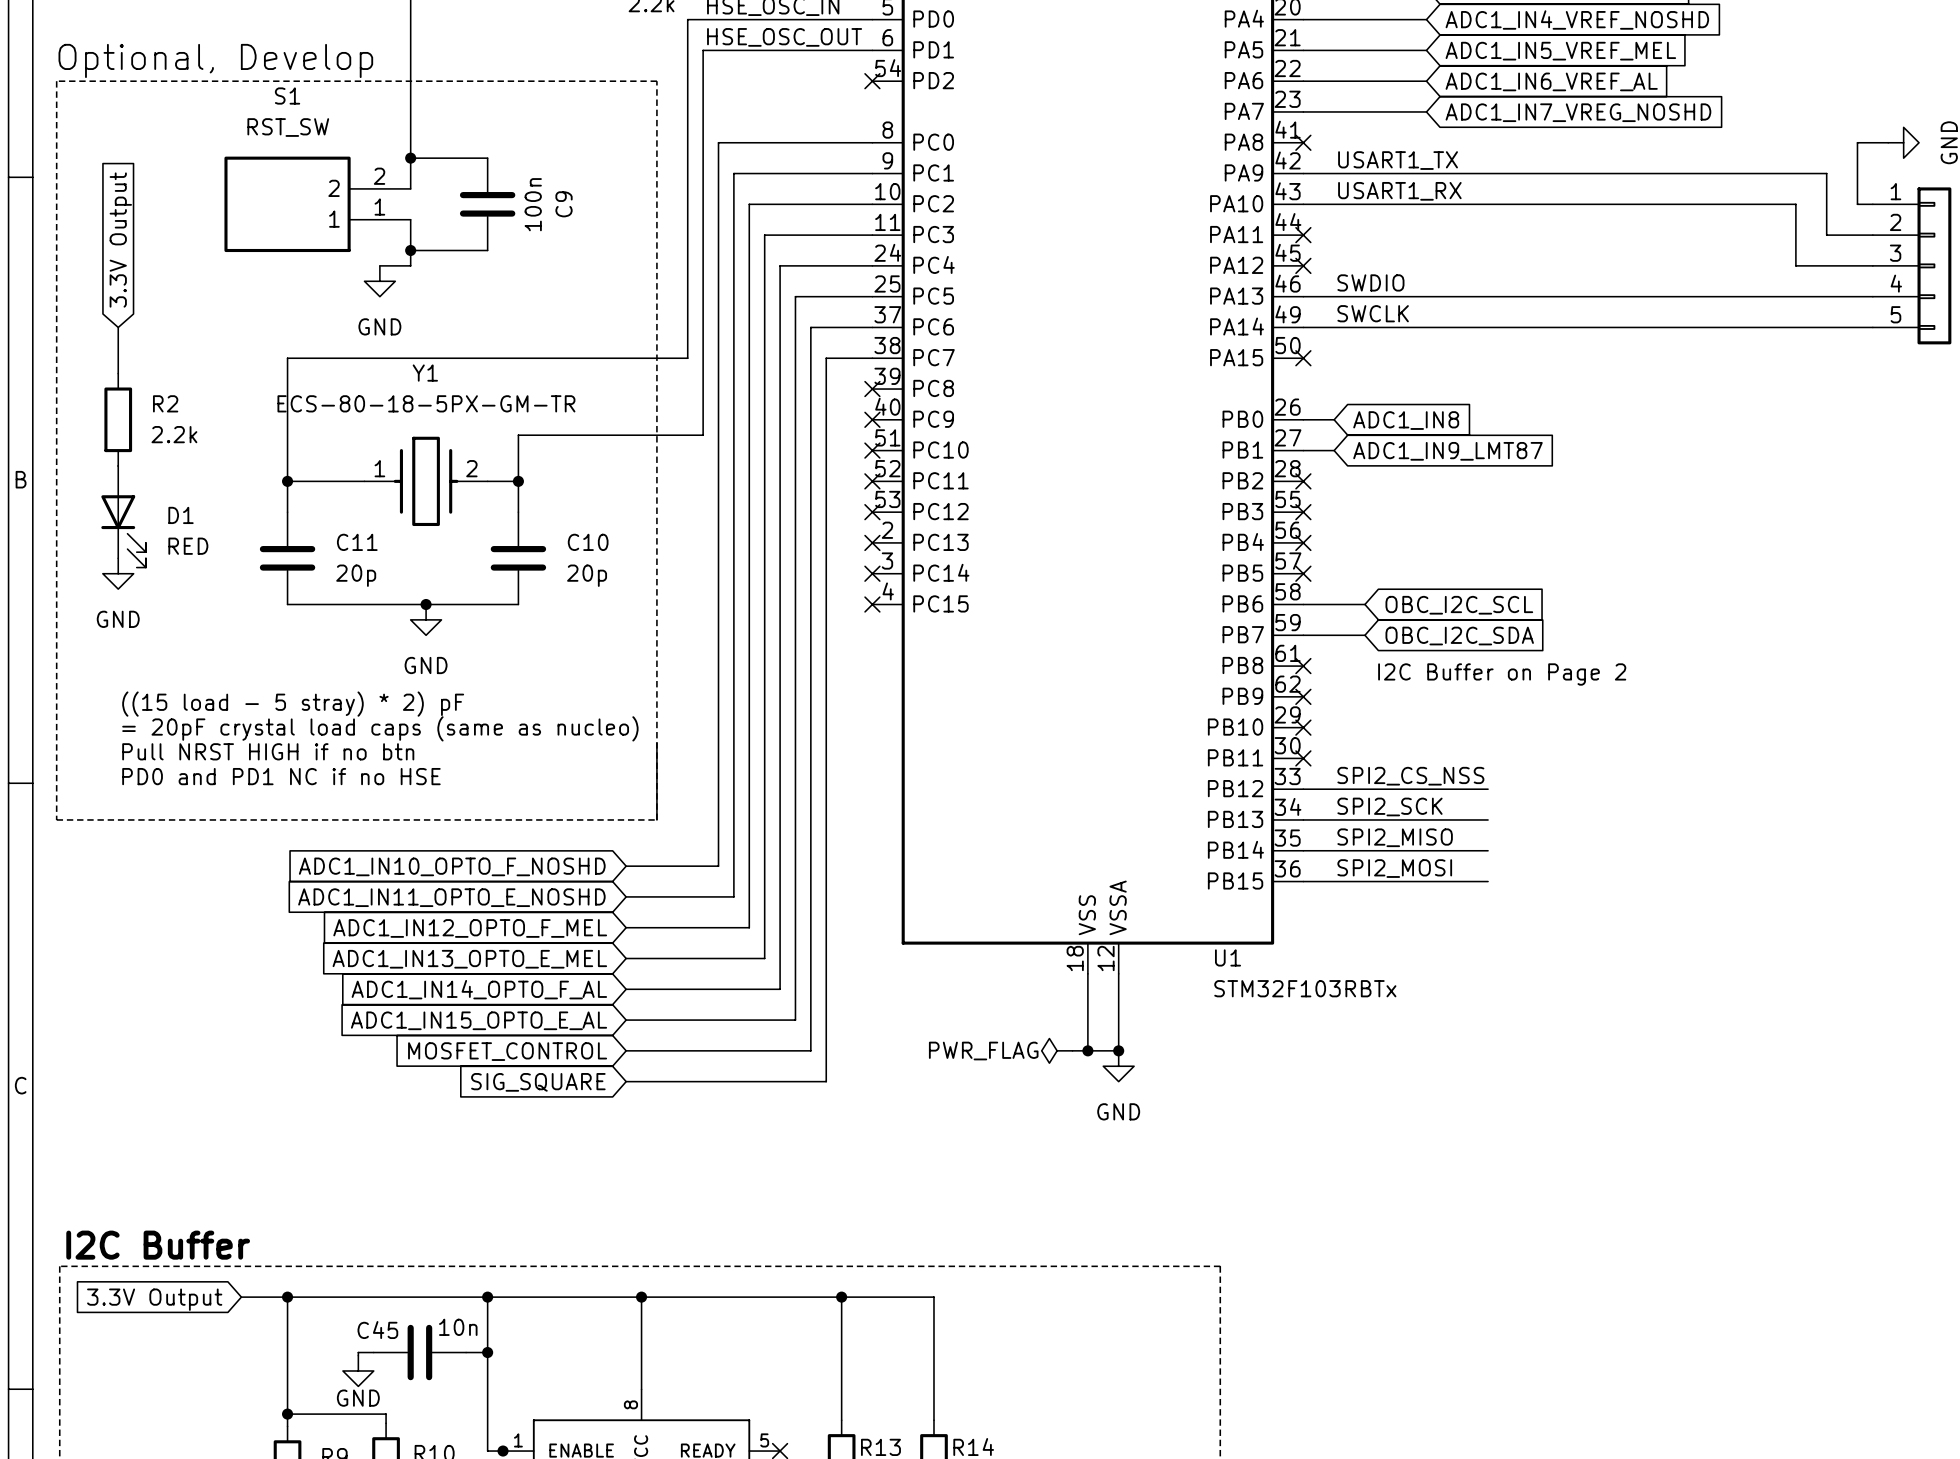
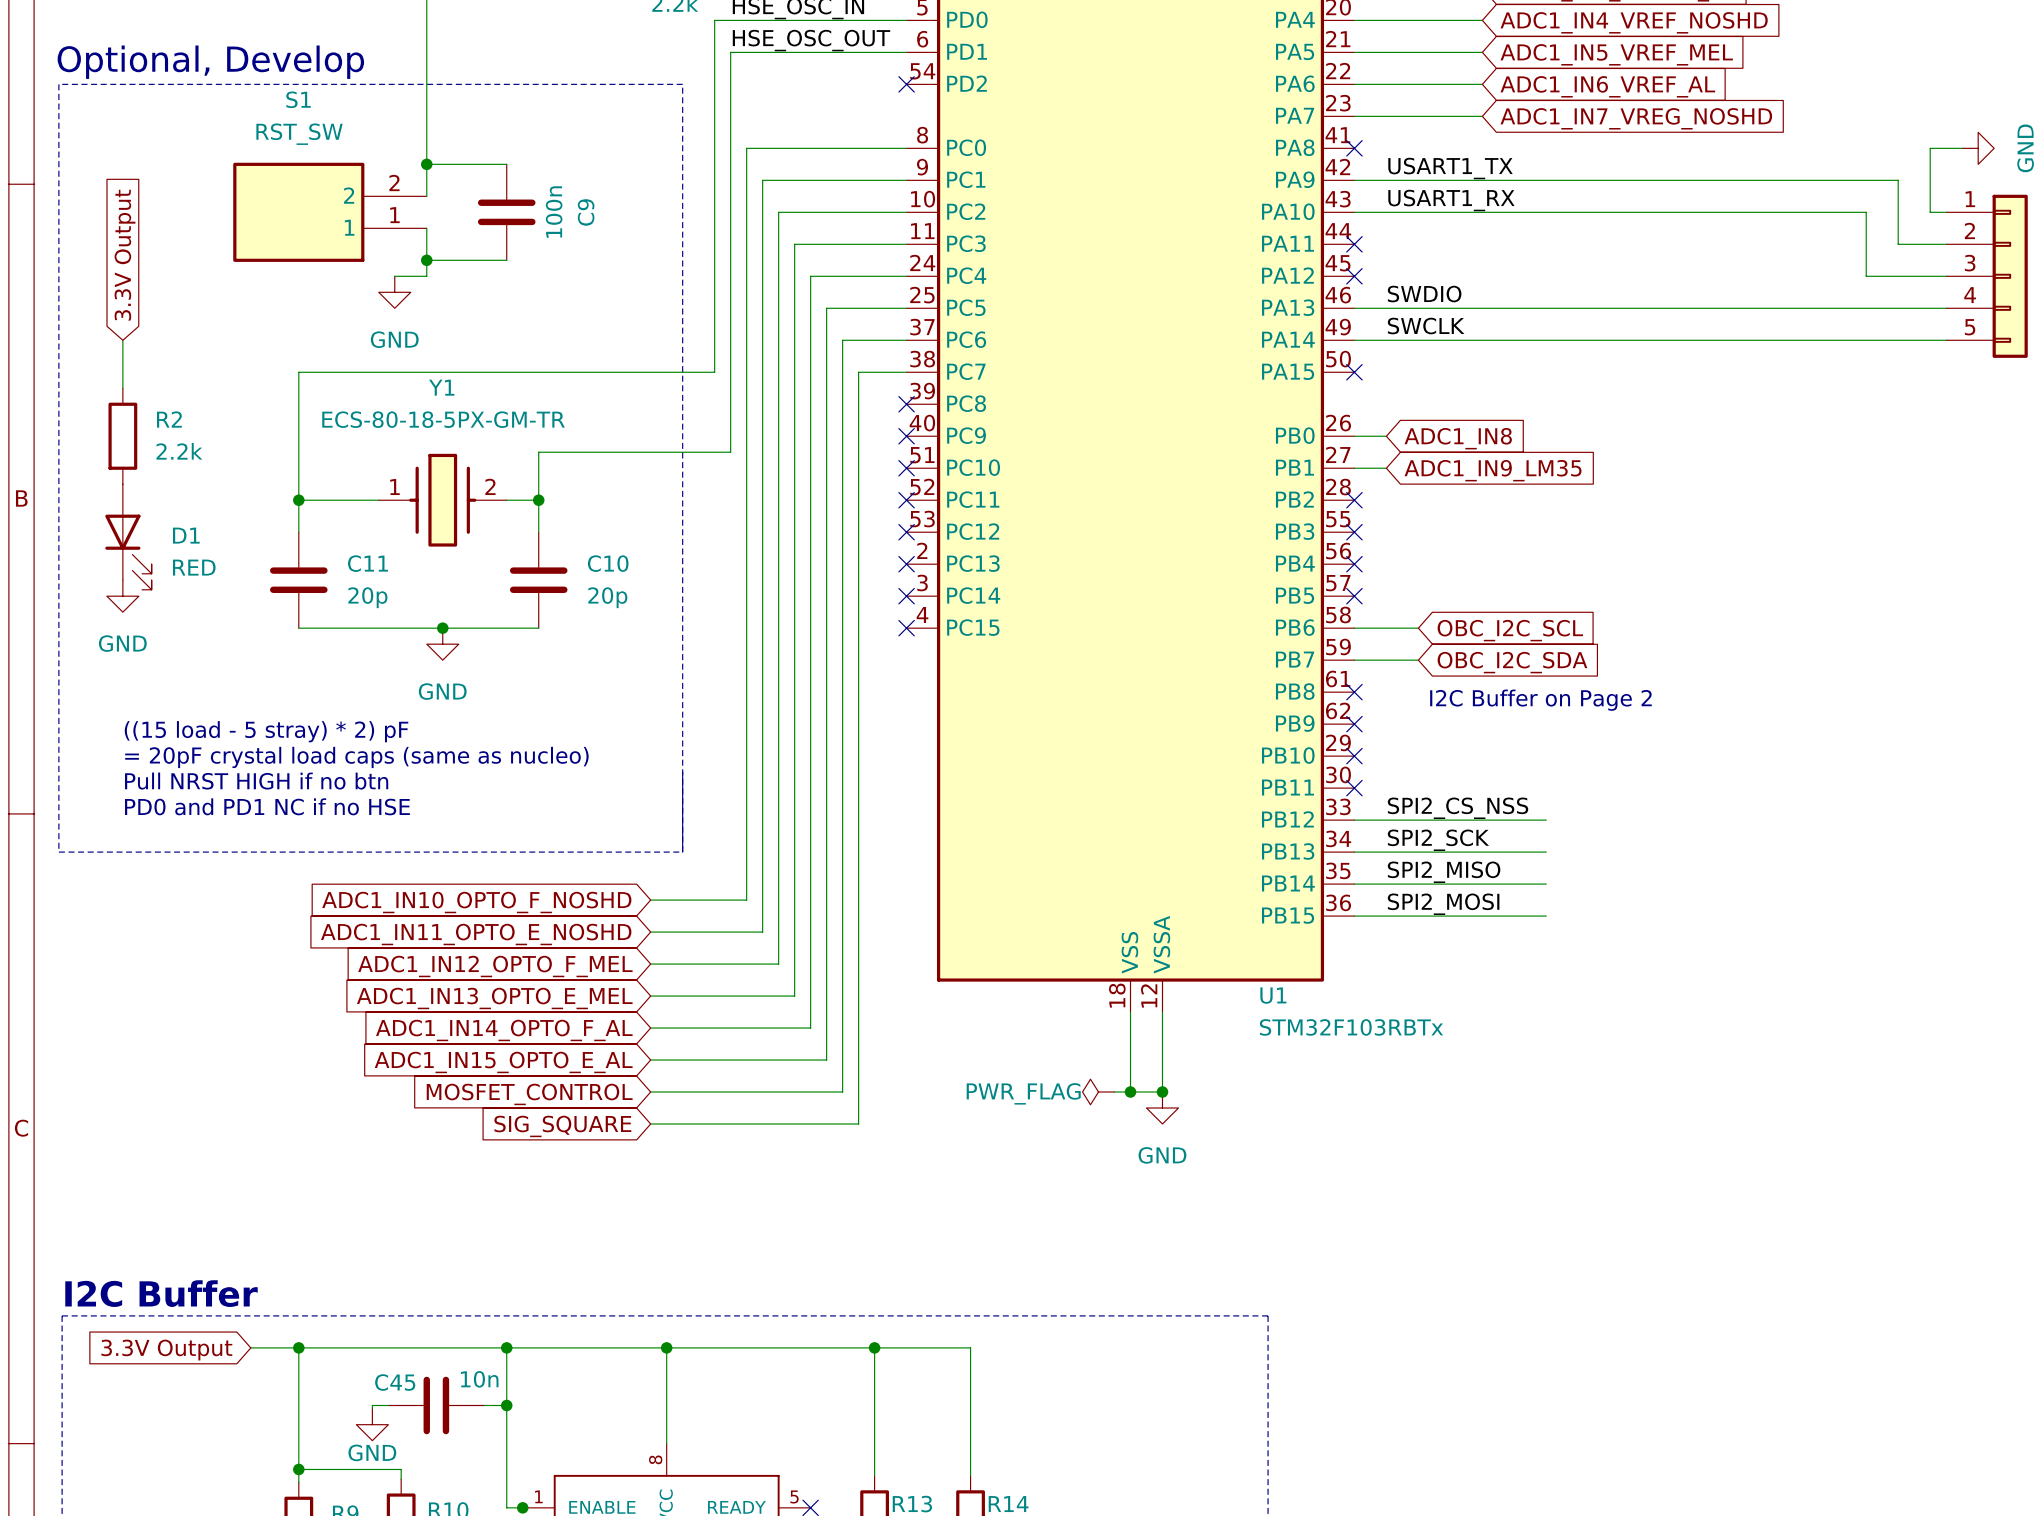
global label: ADC1_IN9_LMT87 (1447, 451) -> ADC1_IN9_LM35 (1493, 470)

